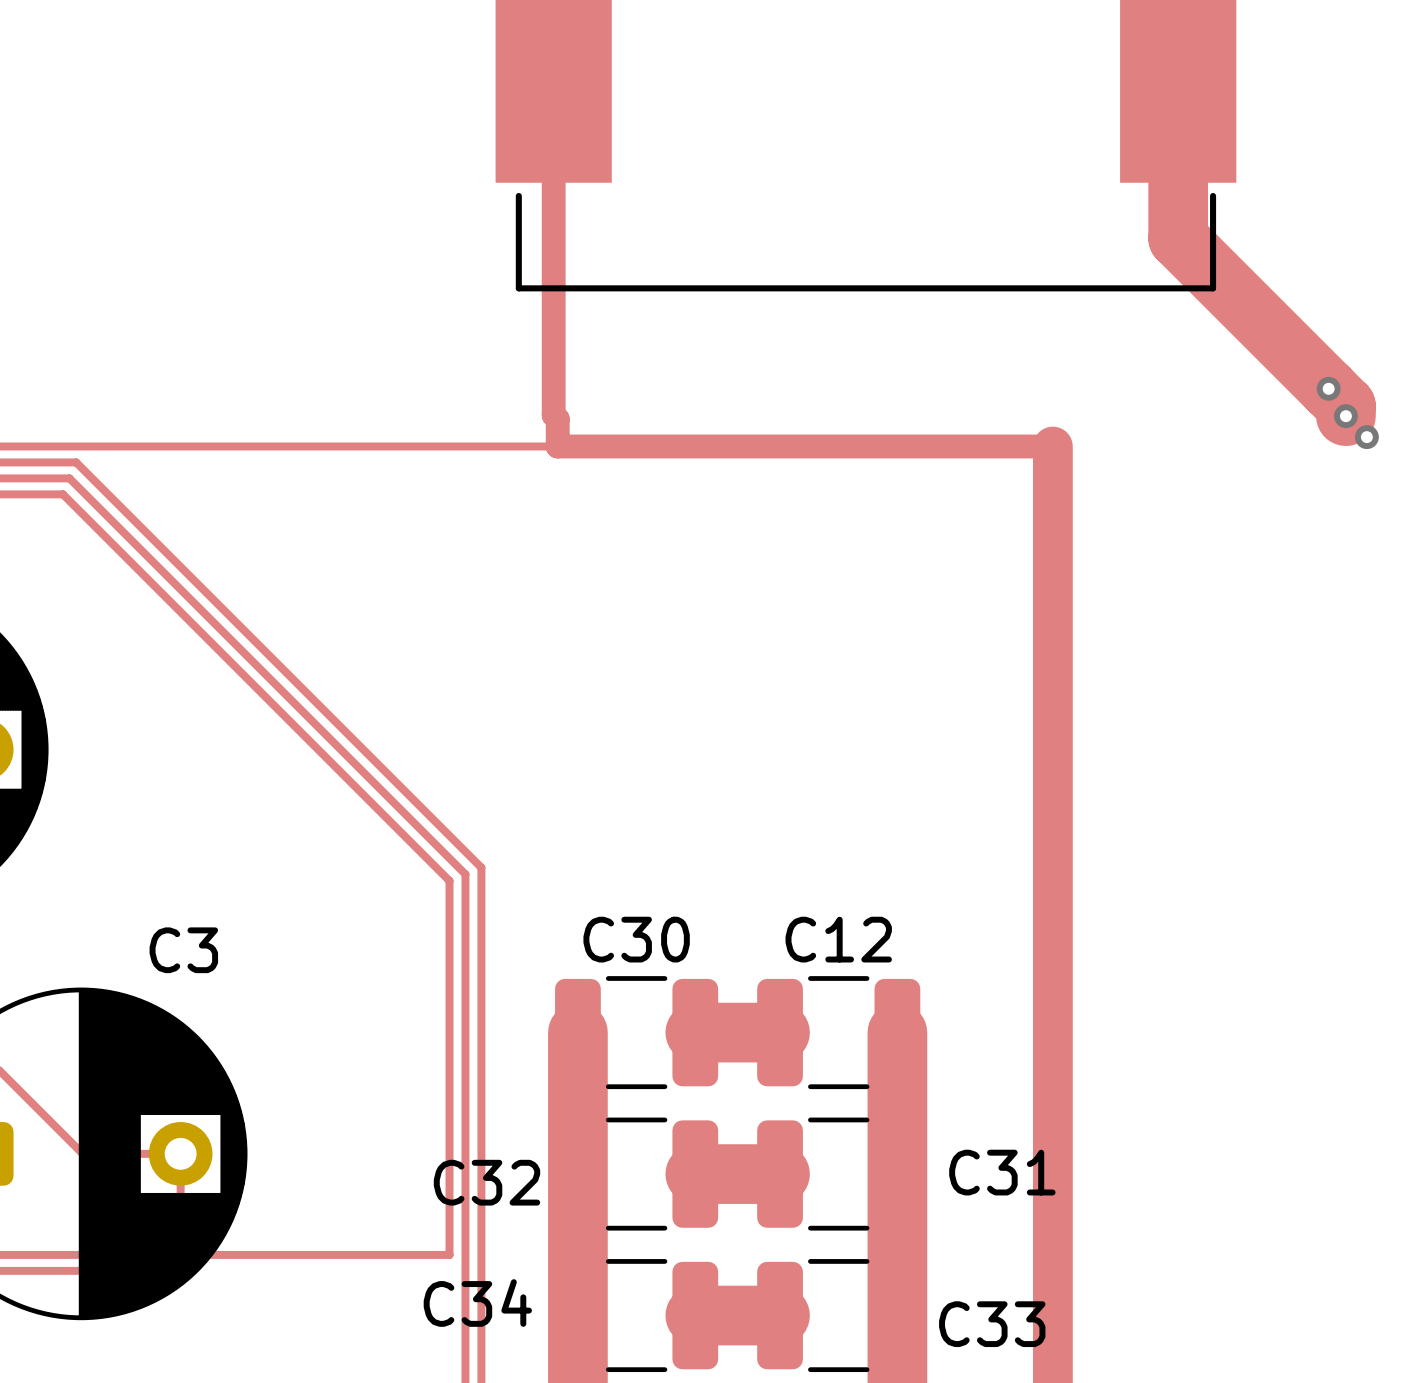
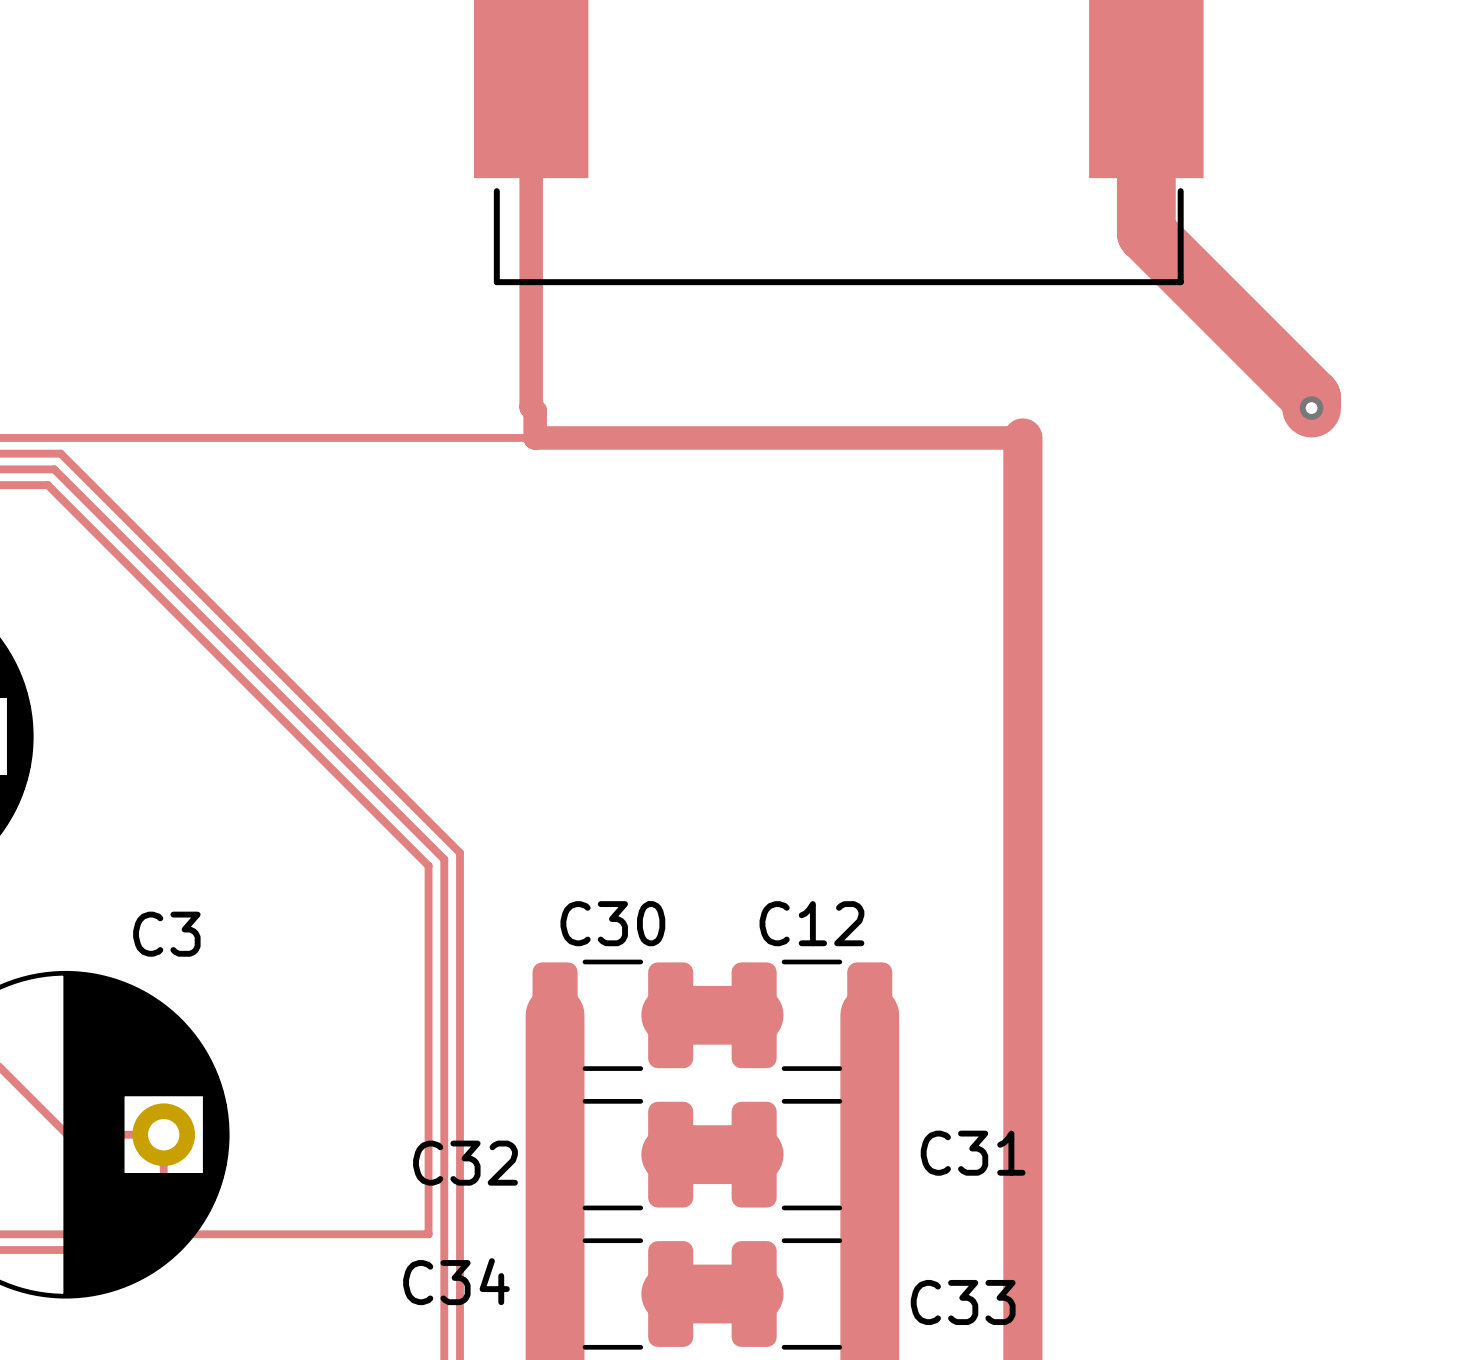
via: (1328, 388) -> none
via: (1366, 437) -> none

